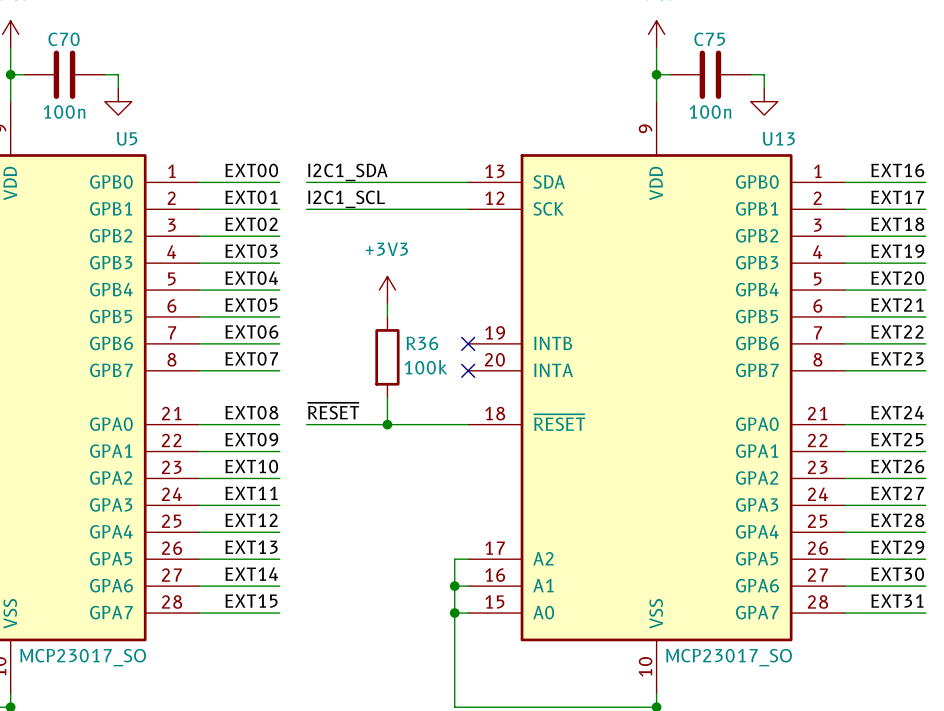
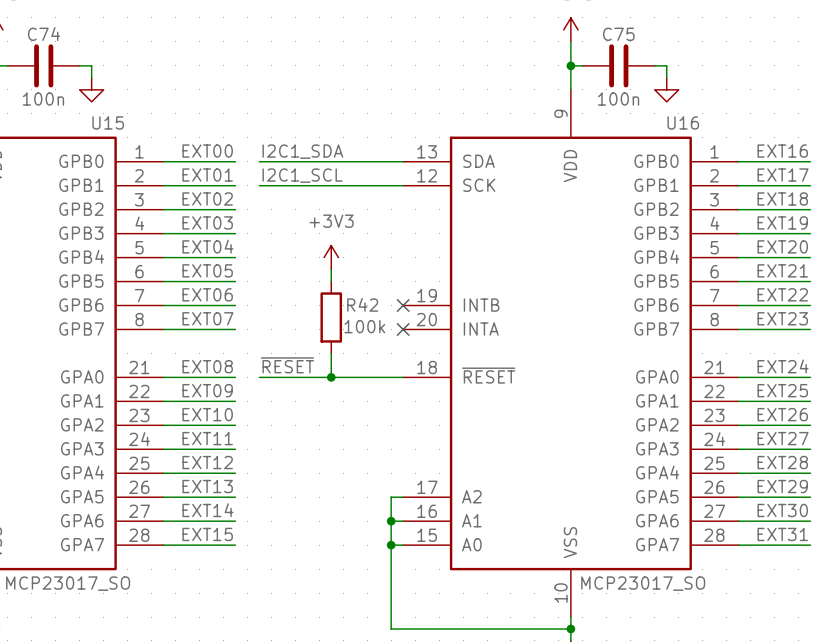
C70 name: C70 (64, 39) -> C74 (44, 34)
U5 name: U5 (127, 138) -> U15 (108, 122)
U13 name: U13 (778, 138) -> U16 (683, 122)
R36 name: R36 (422, 343) -> R42 (362, 304)

